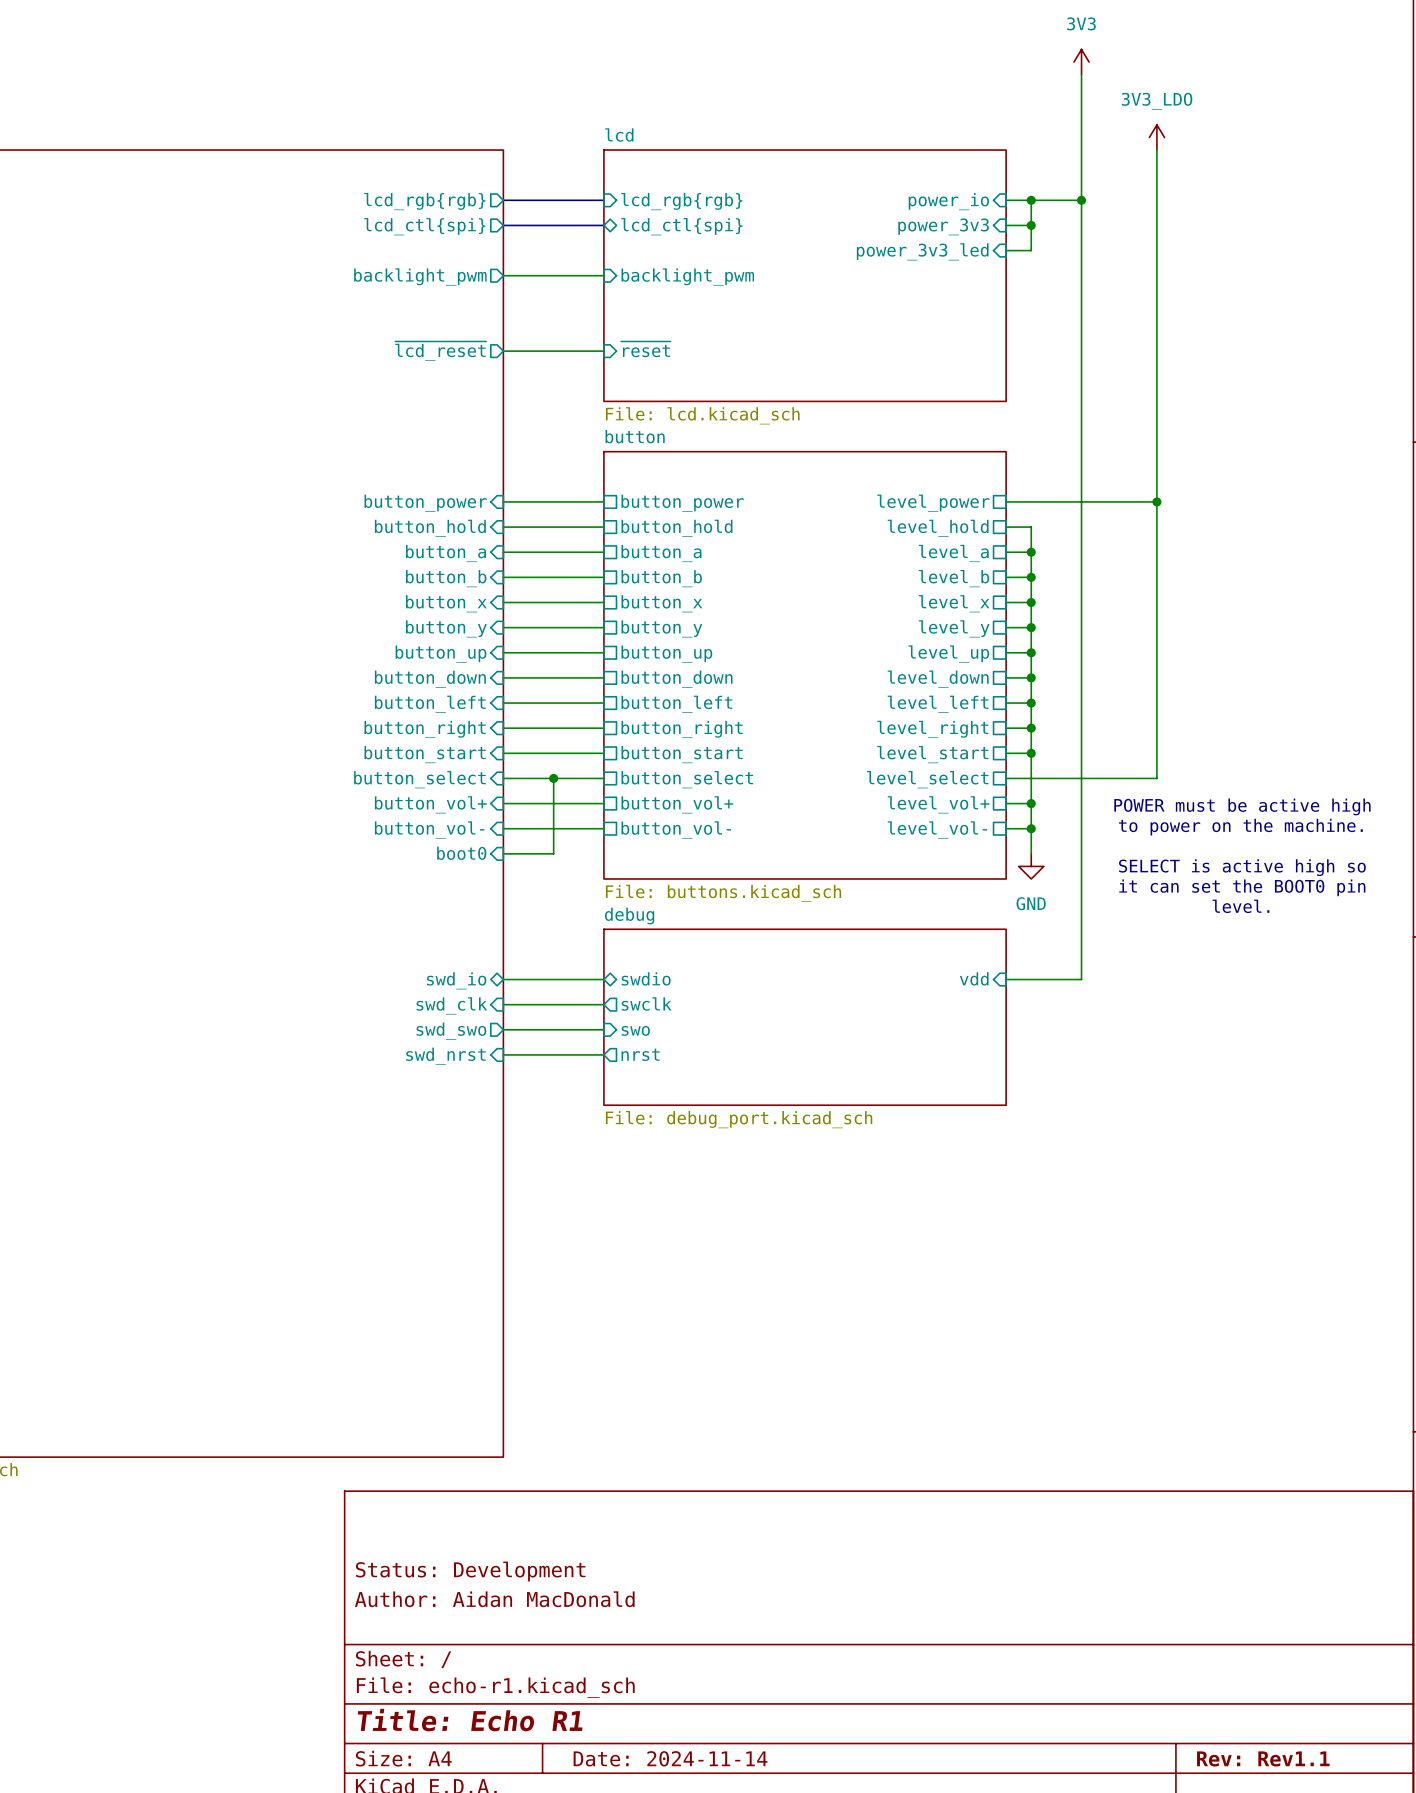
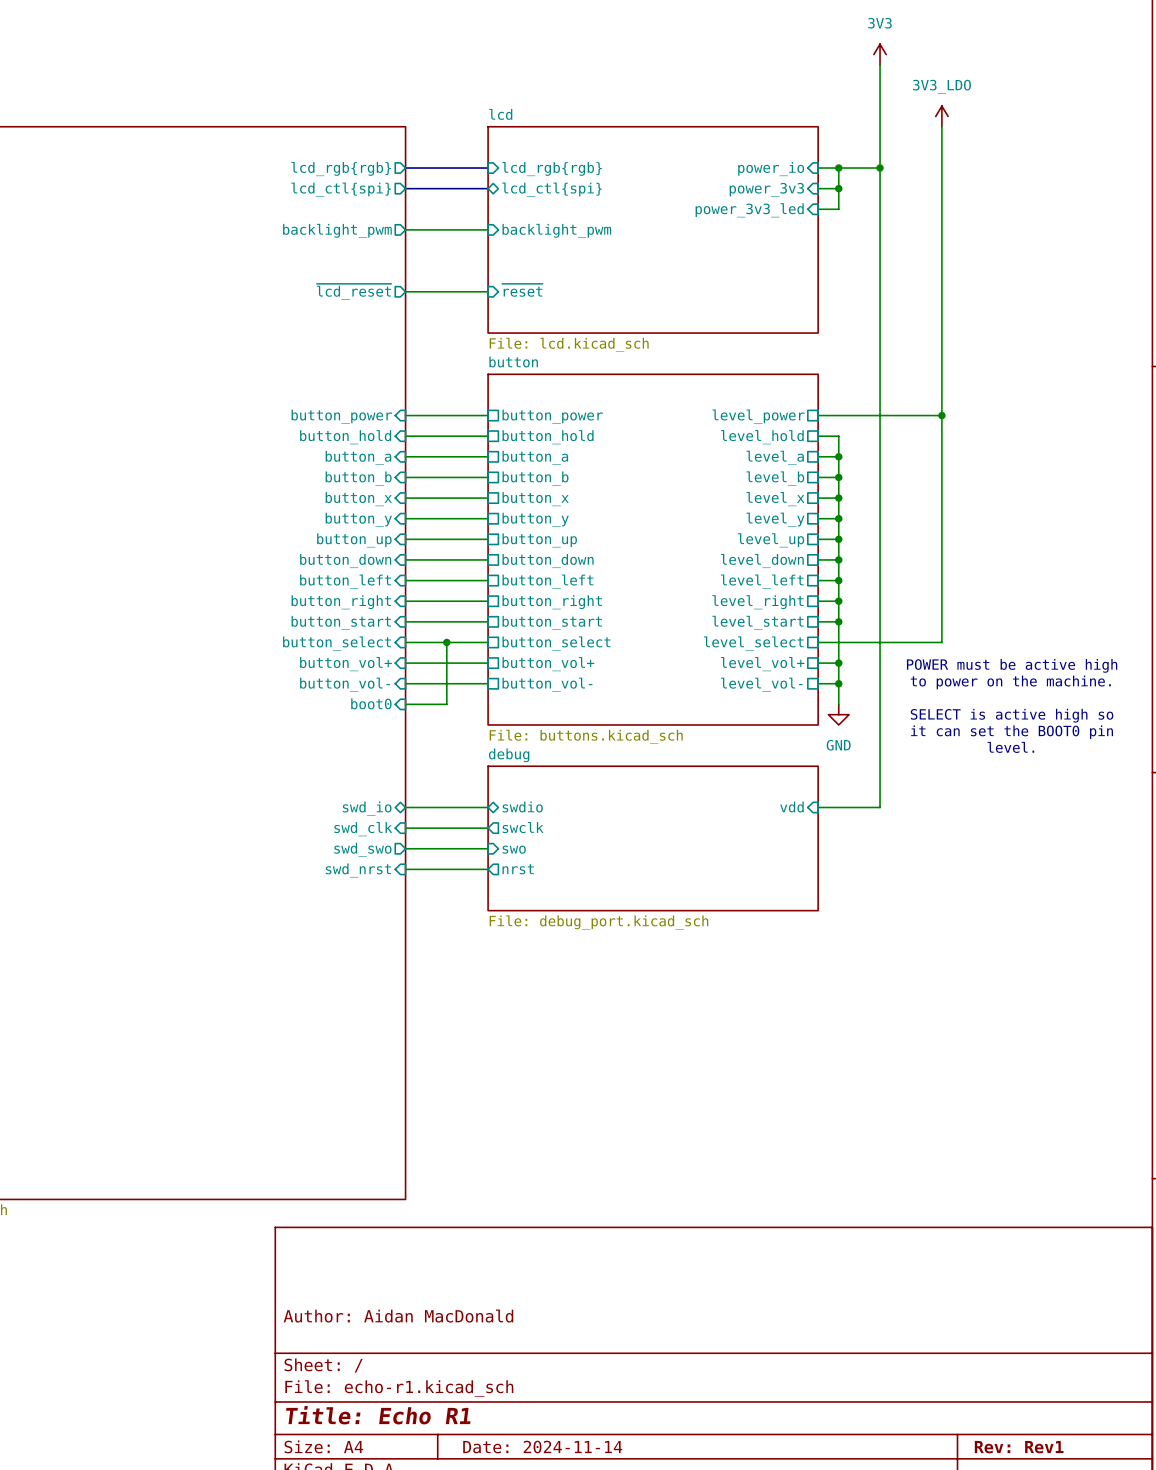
title block: Status: Development (470, 1571) -> none
title block: Rev: Rev1.1 (1263, 1758) -> Rev: Rev1 (1019, 1447)

